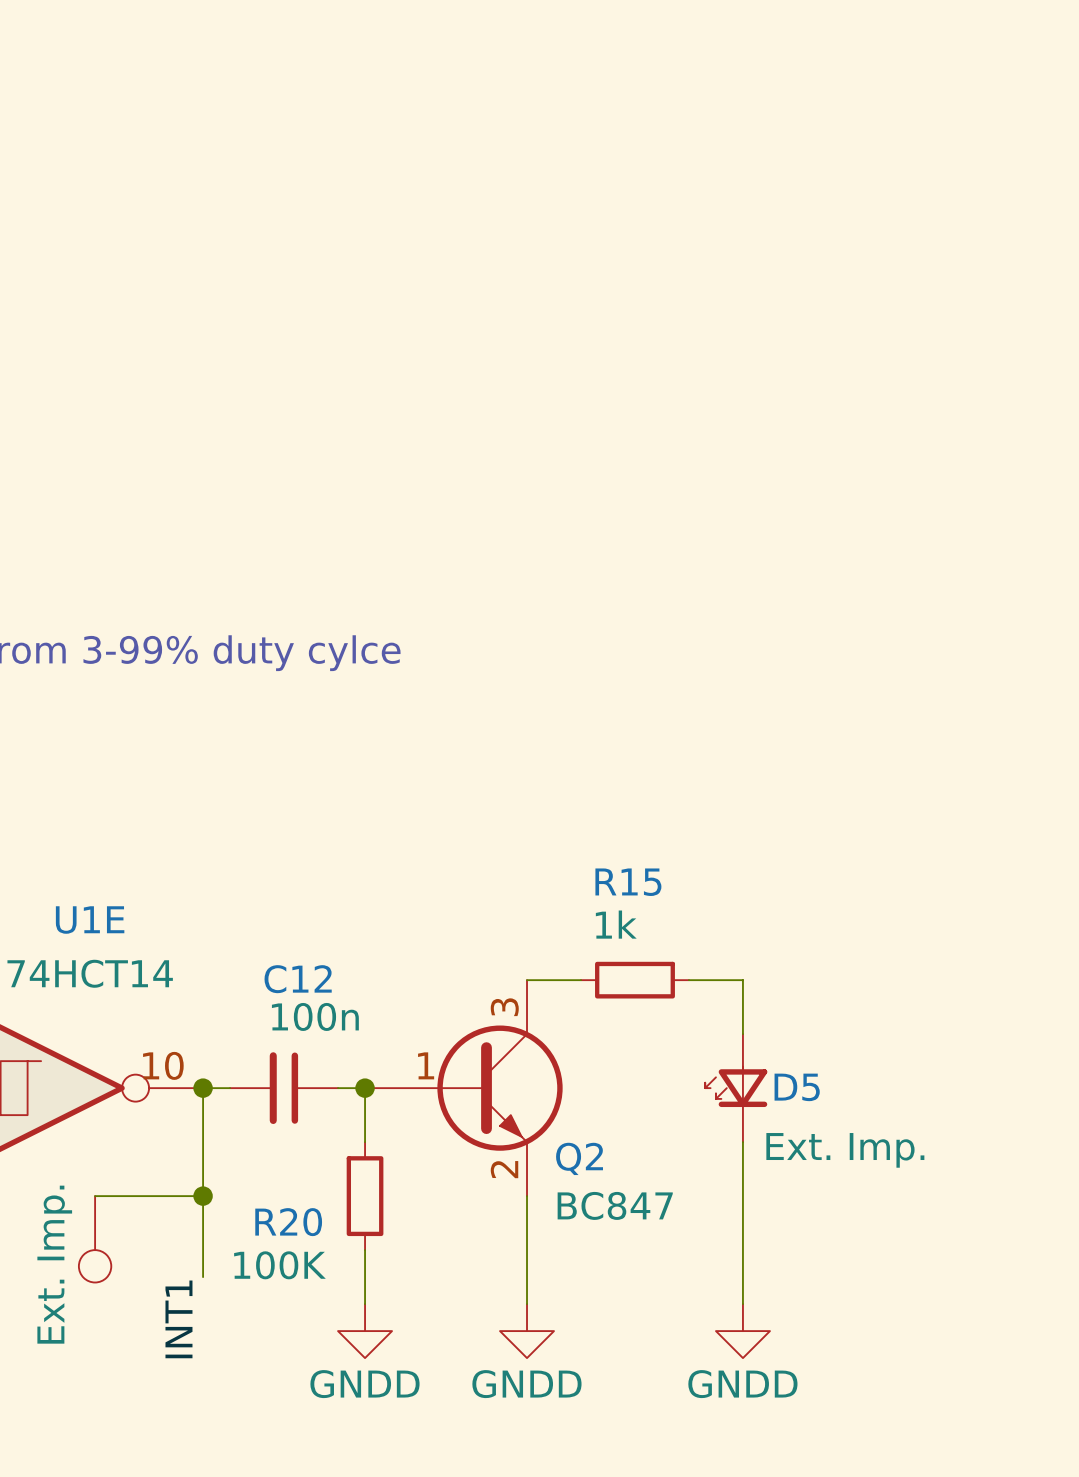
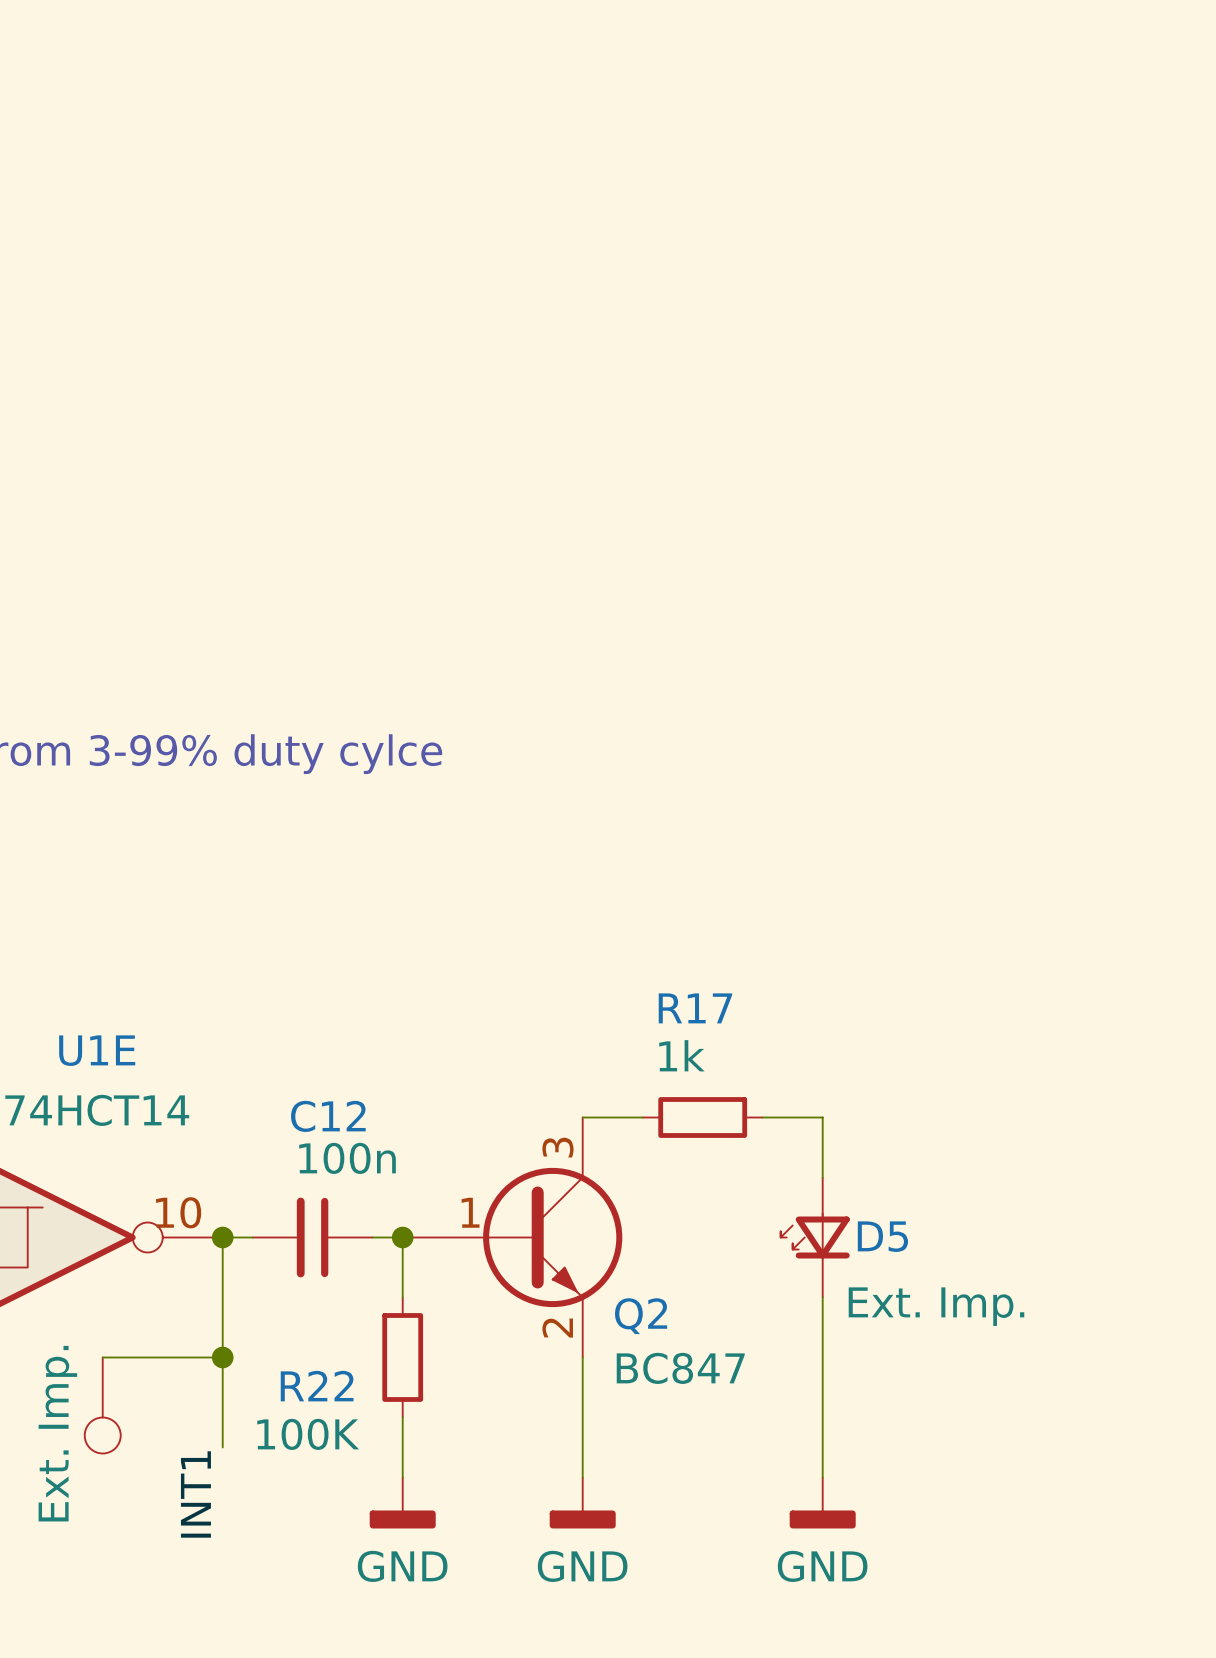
R15 name: R15 (628, 882) -> R17 (695, 1008)
R20 name: R20 (288, 1222) -> R22 (317, 1386)
power symbol: GNDD (365, 1331) -> GND (402, 1502)
power symbol: GNDD (527, 1331) -> GND (582, 1502)
power symbol: GNDD (742, 1331) -> GND (822, 1502)

